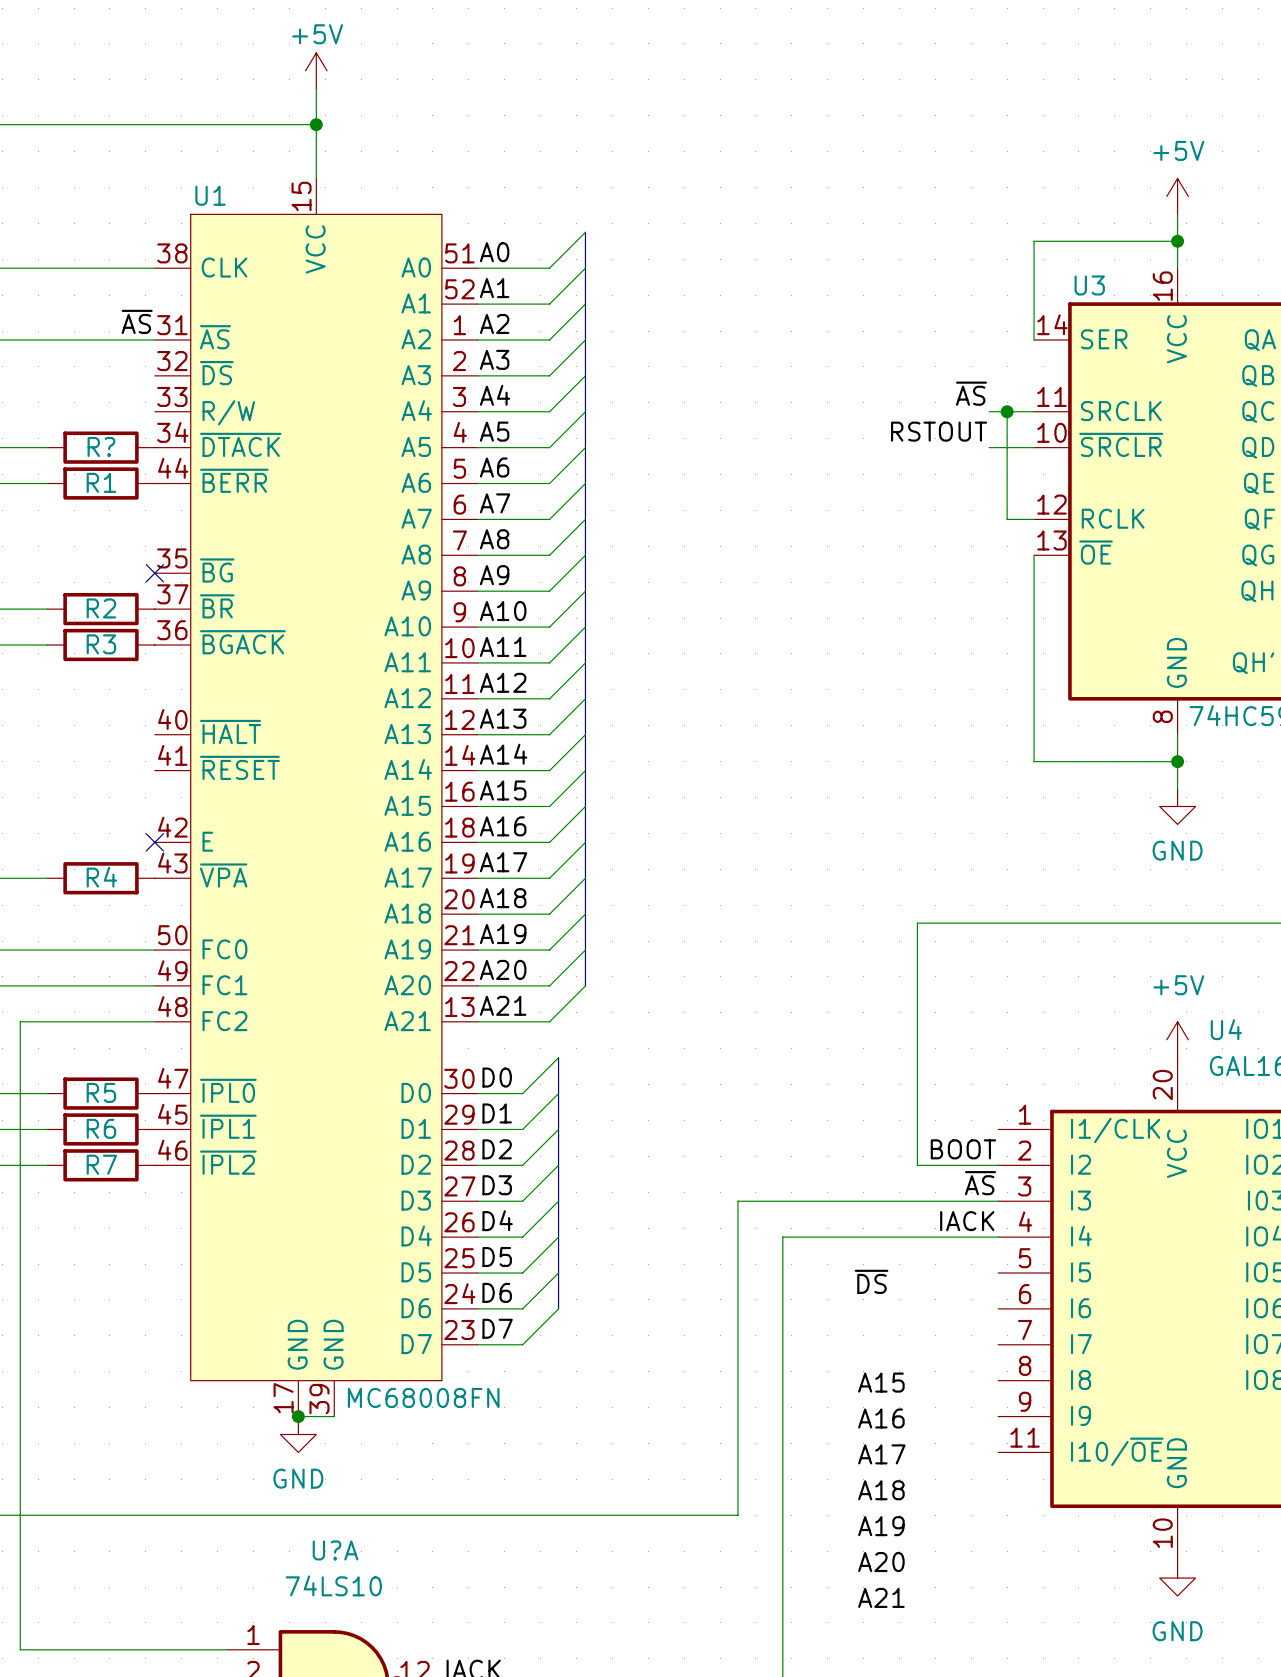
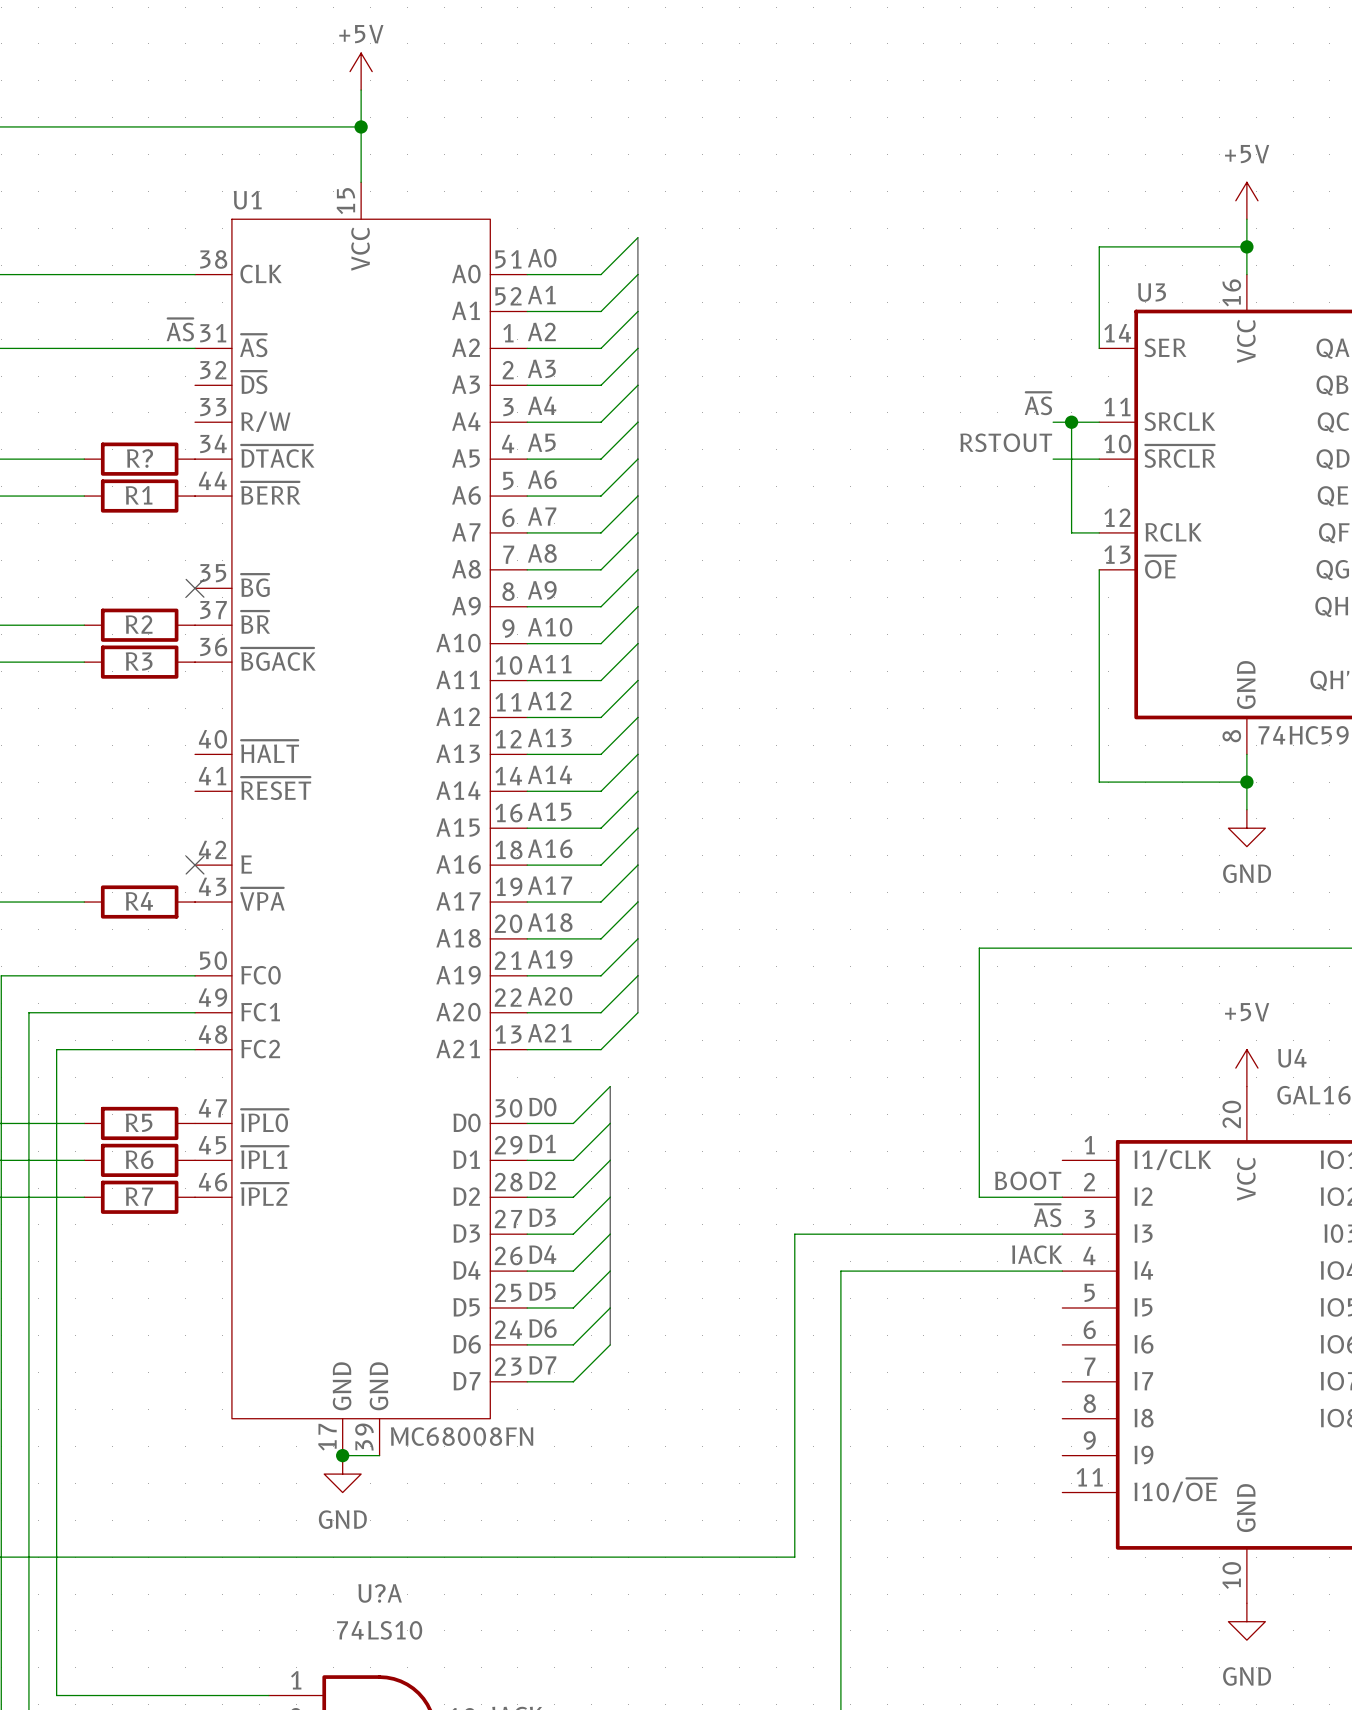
label: ~{DS} (871, 1281) -> none
label: A15 (881, 1382) -> none
label: A16 (881, 1418) -> none
label: A17 (881, 1454) -> none
label: A18 (881, 1490) -> none
label: A19 (881, 1526) -> none
label: A20 (881, 1562) -> none
label: A21 (881, 1597) -> none

